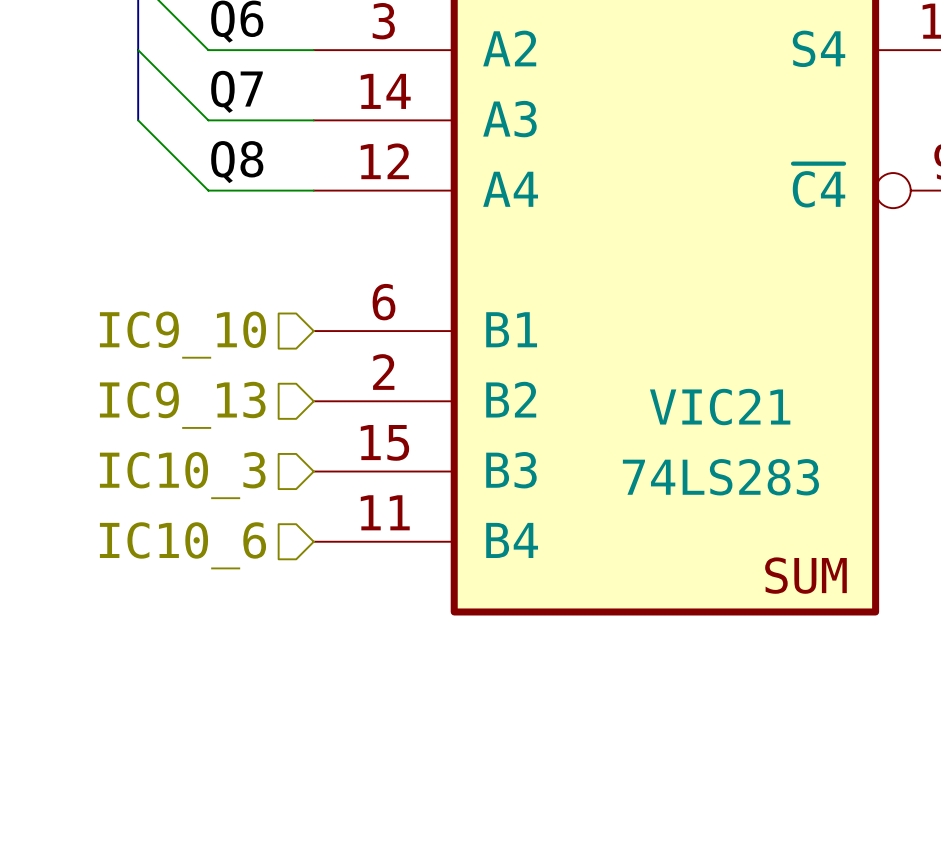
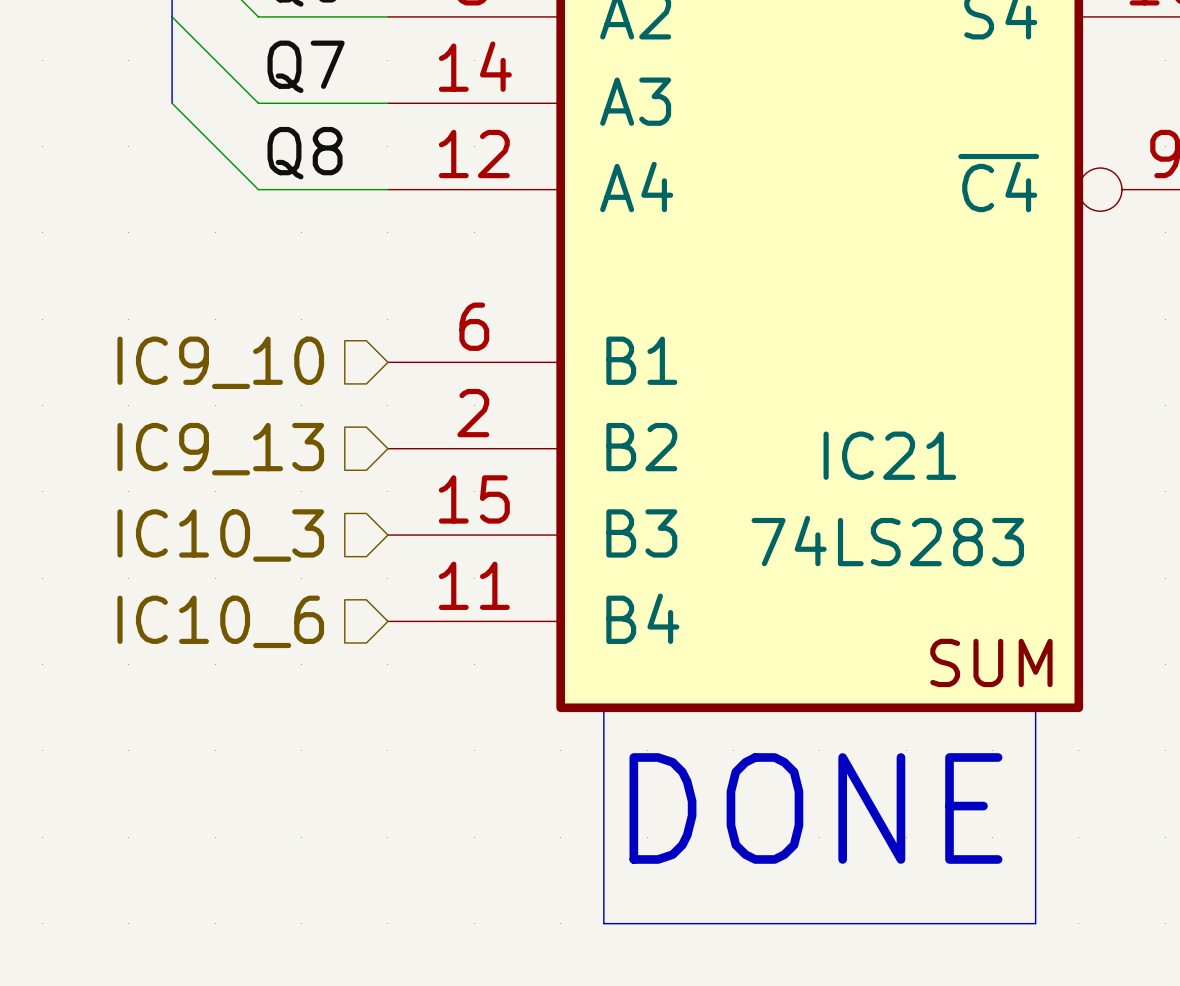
VIC21 name: VIC21 (720, 407) -> IC21 (889, 455)
line: none -> (603, 707) (1035, 707) (1035, 923) (603, 923) (603, 707)
text: none -> DONE (815, 808)

